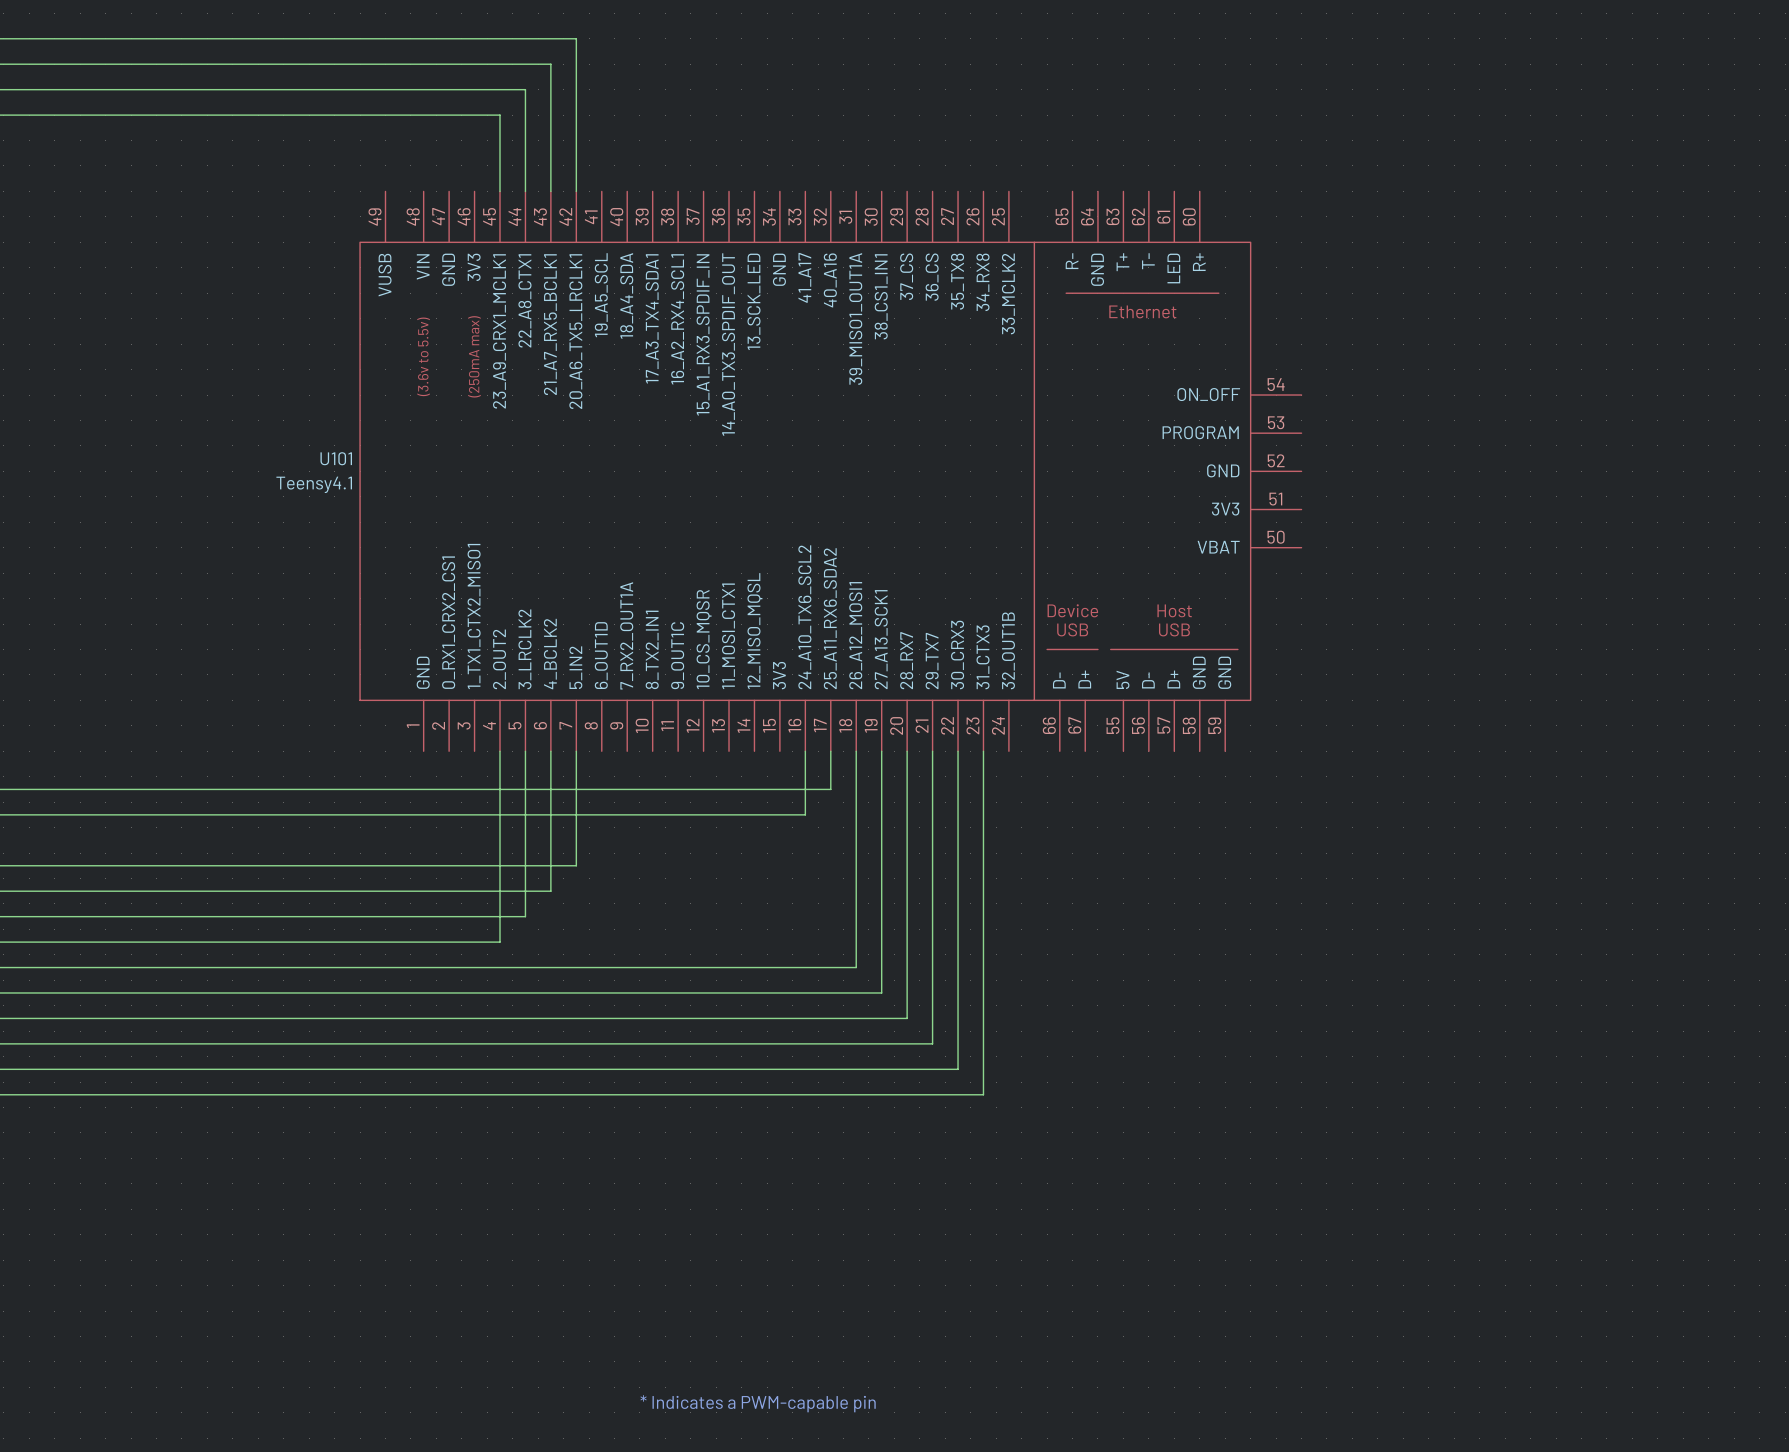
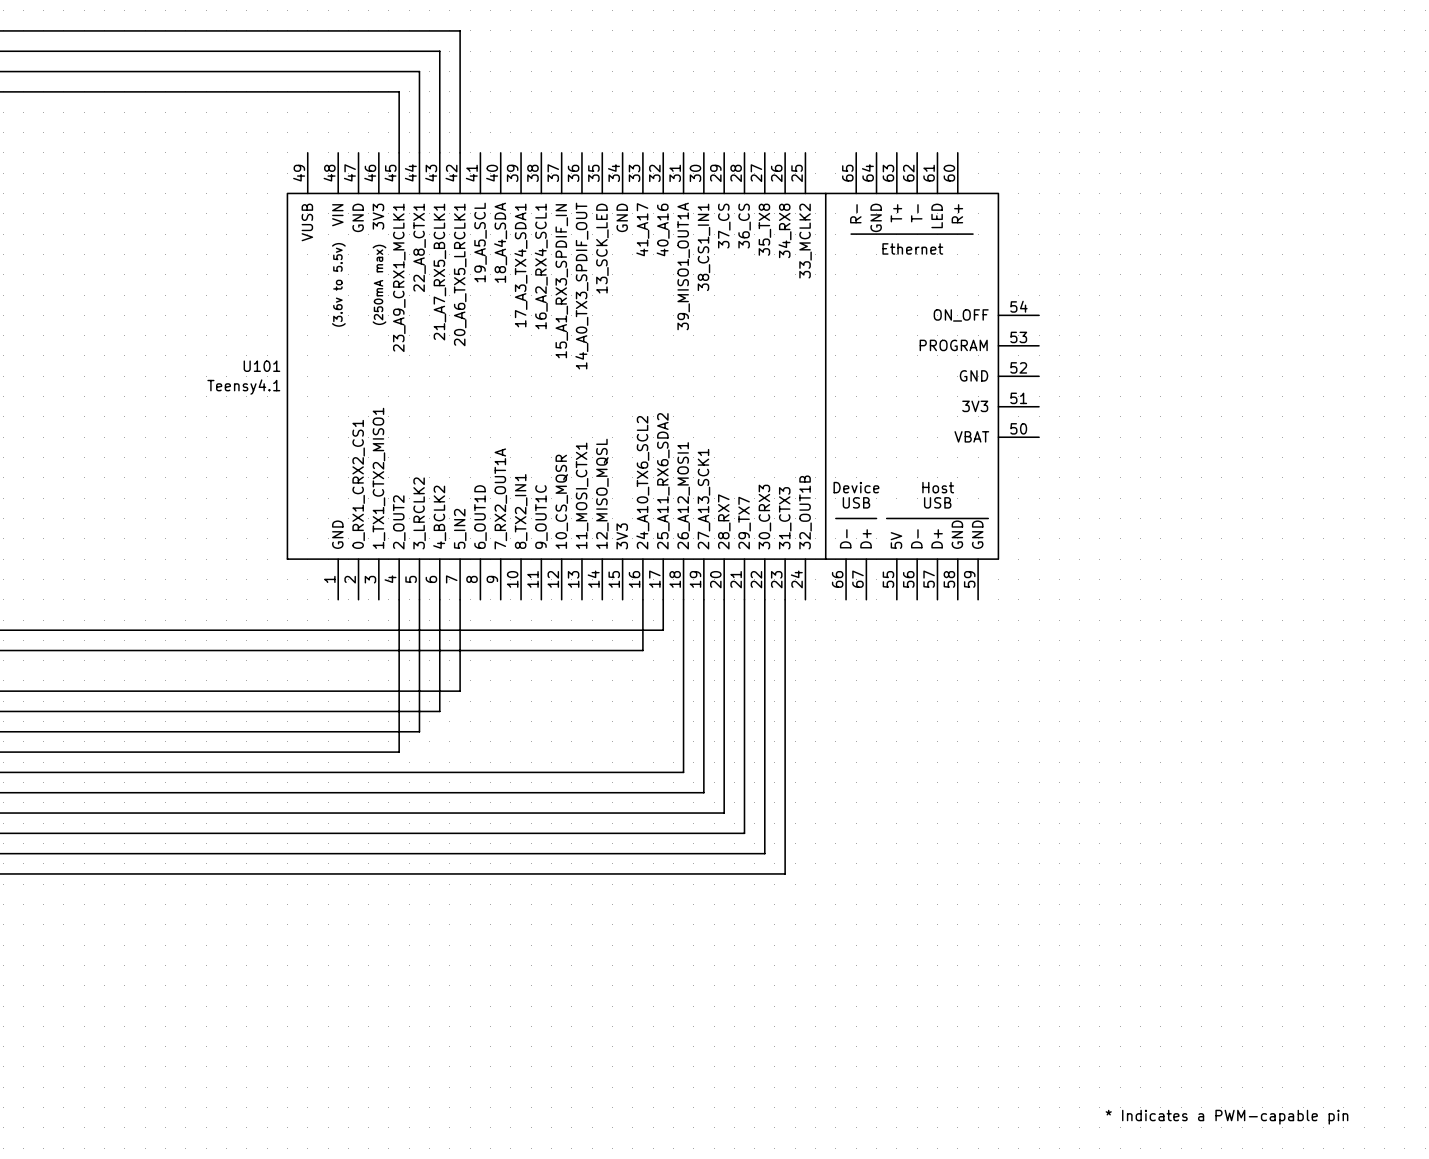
text: none -> * Indicates a PWM-capable pin (1226, 1117)
text: * Indicates a PWM-capable pin (758, 1403) -> none

